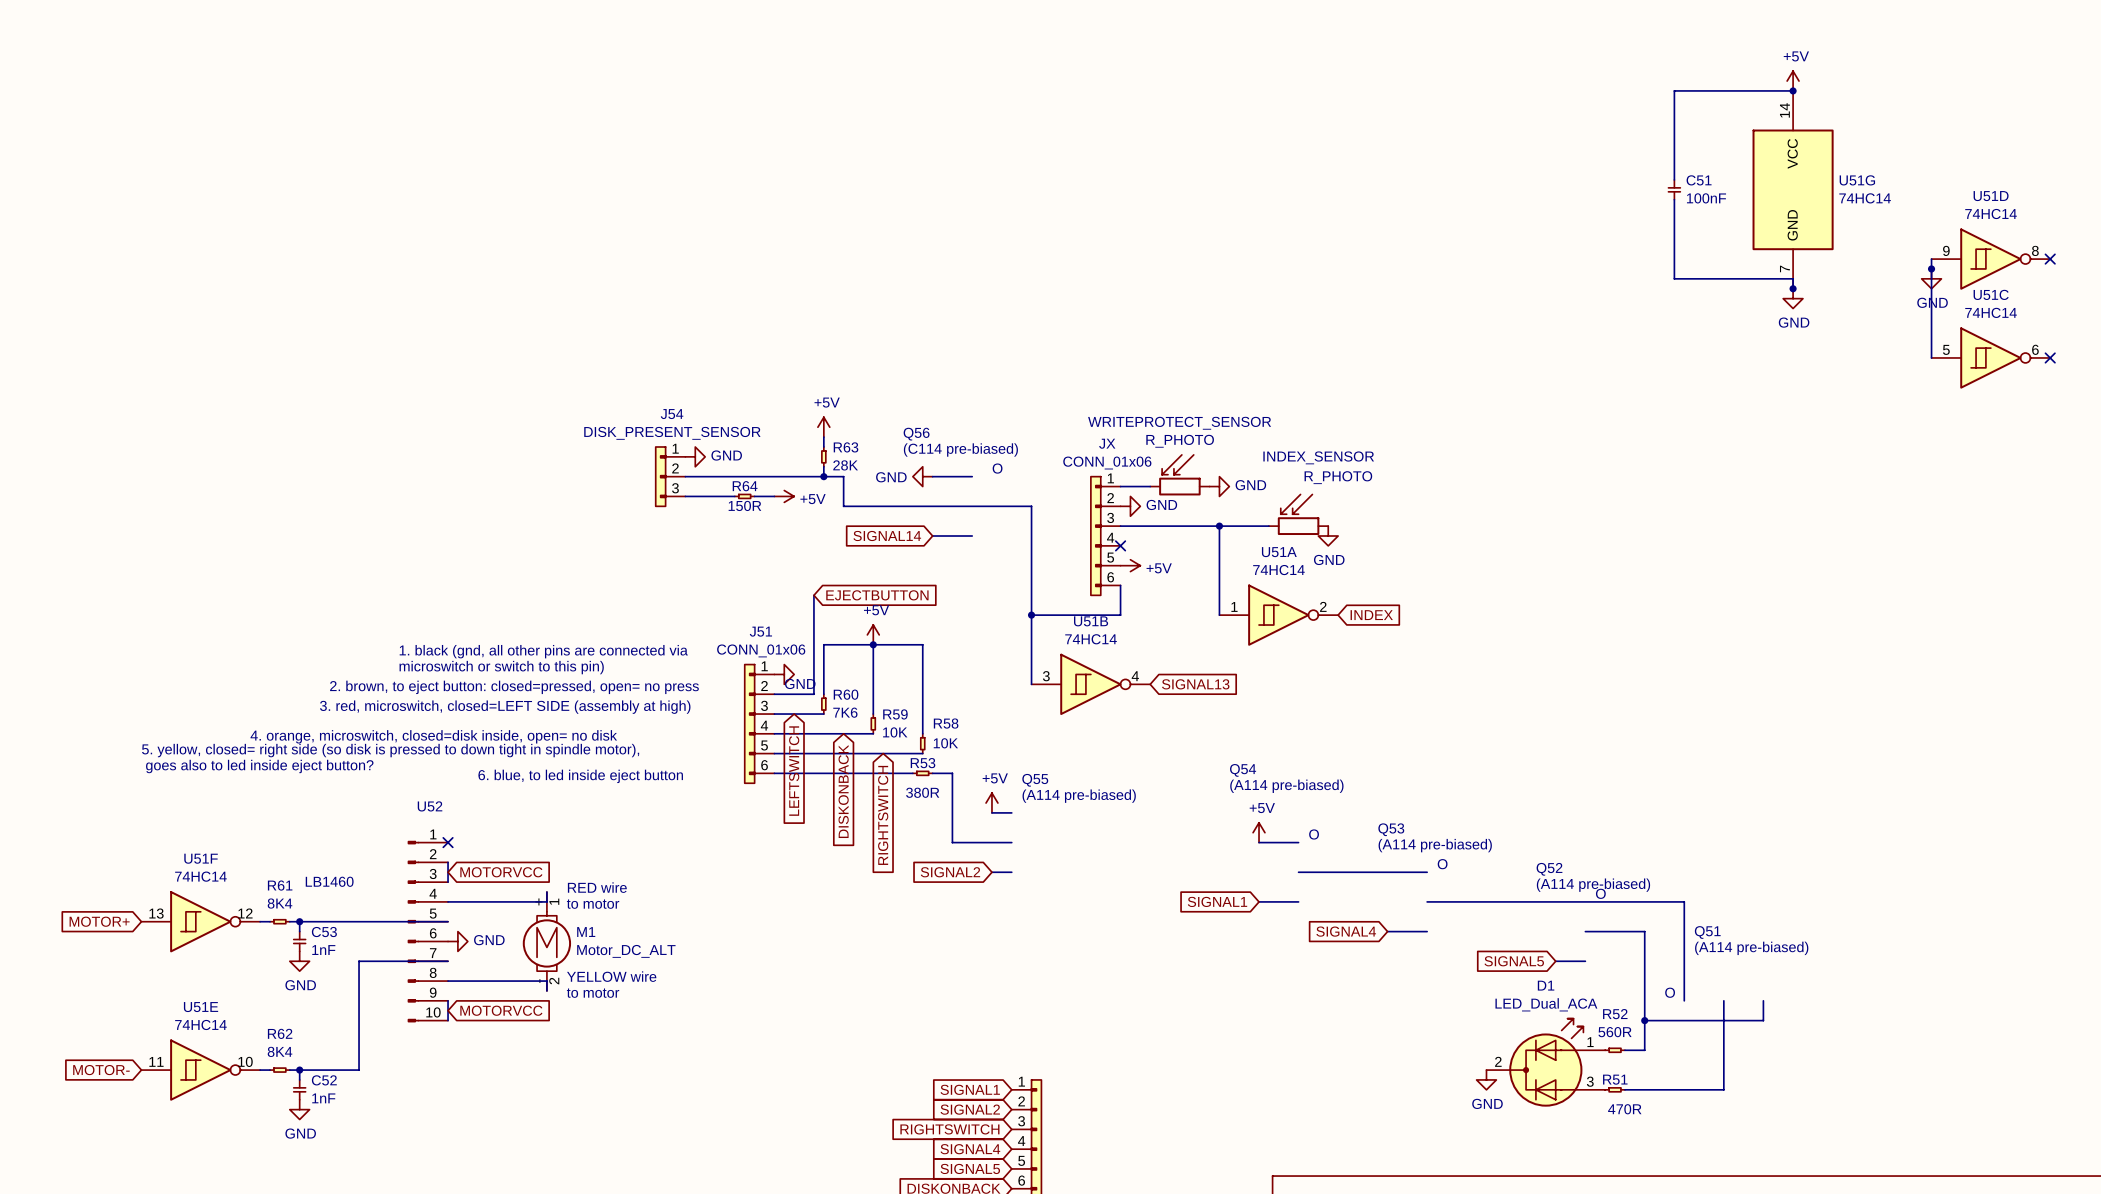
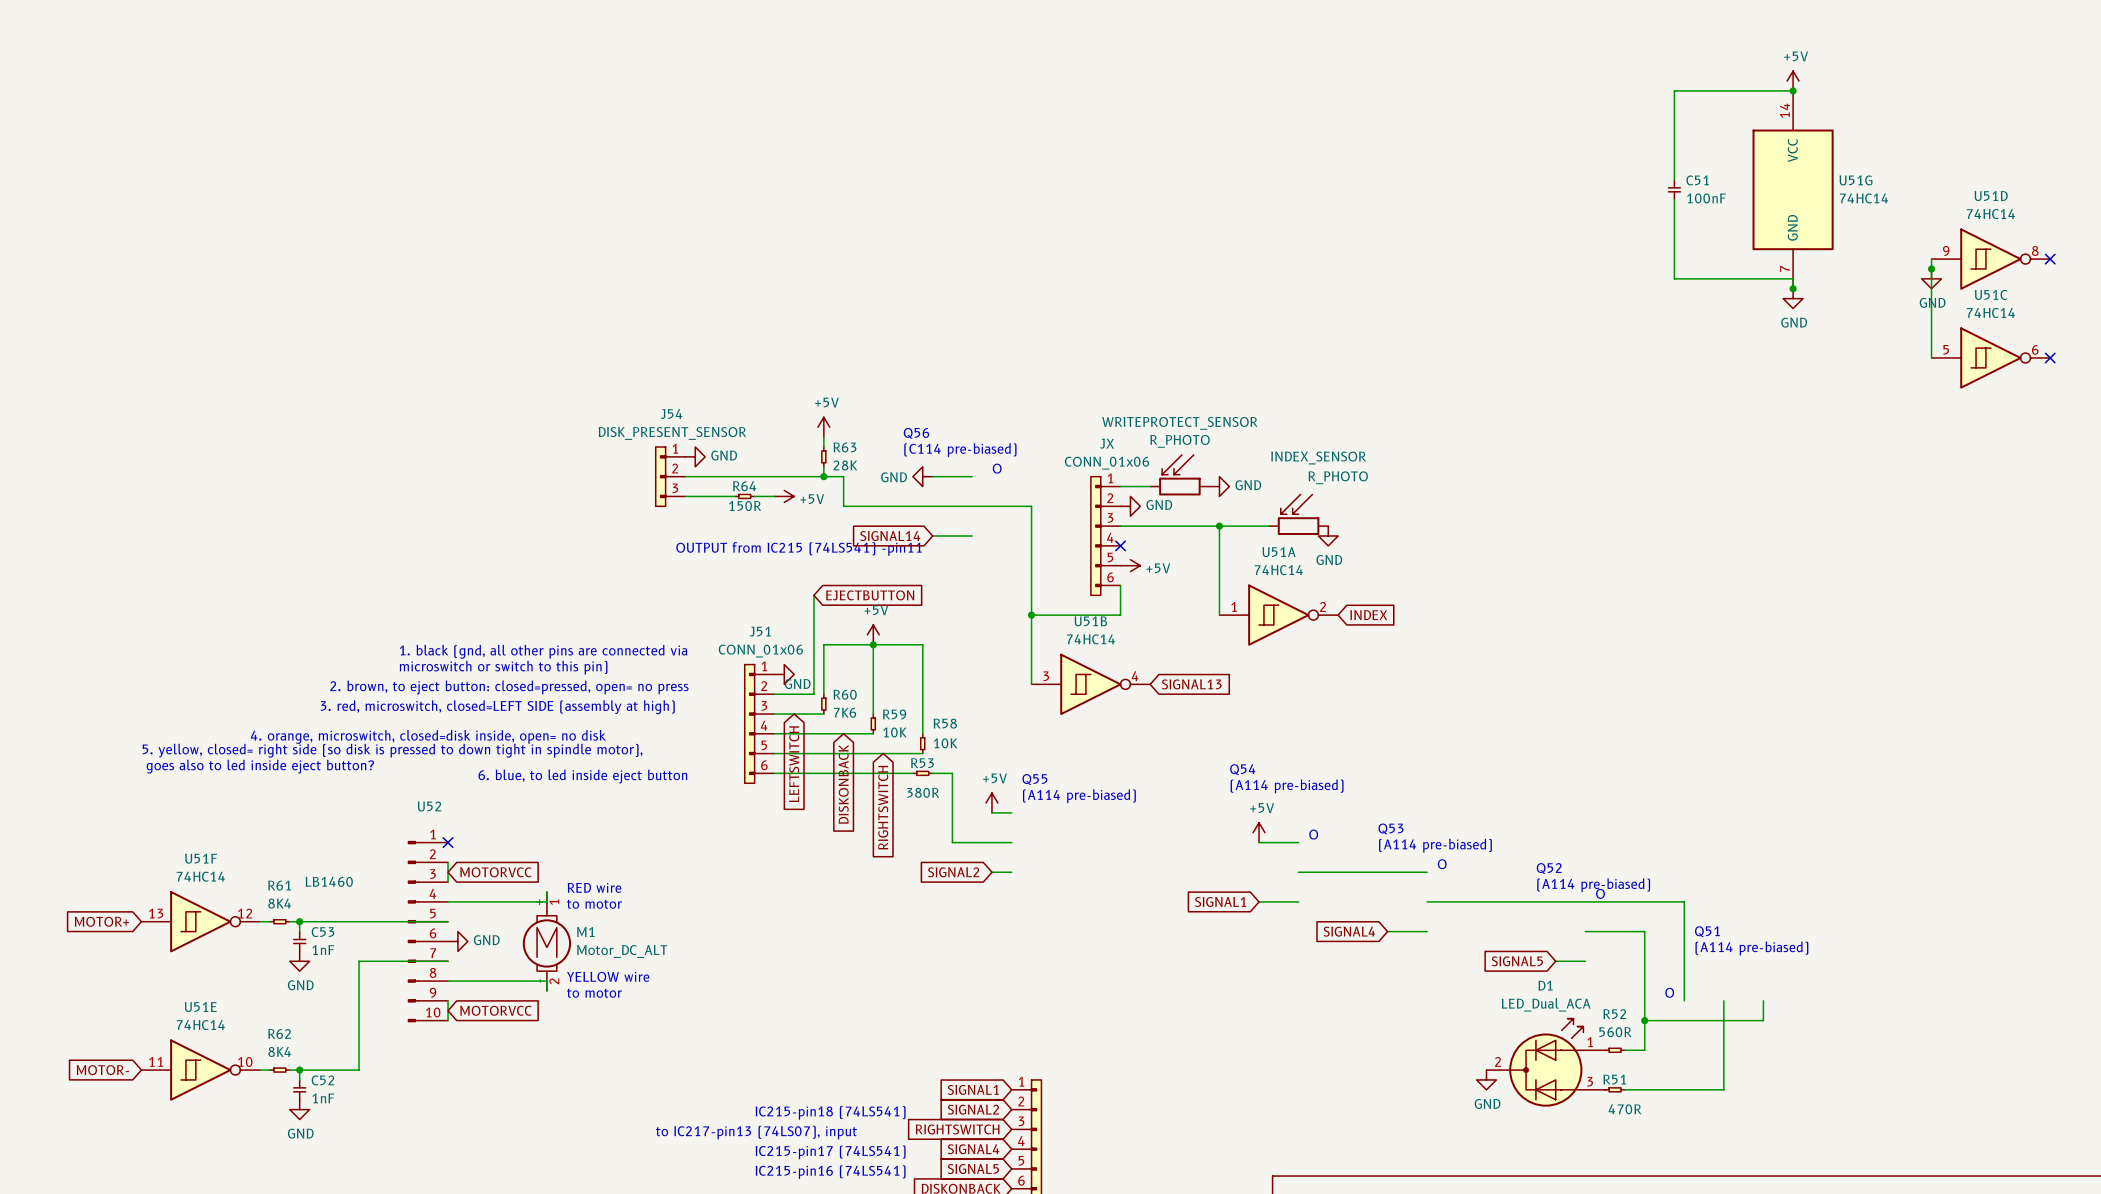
text: none -> OUTPUT from IC215 (74LS541) -pin11 (799, 548)
text: none -> IC215-pin18 (74LS541) (830, 1112)
text: none -> to IC217-pin13 (74LS07), input (756, 1132)
text: none -> IC215-pin17 (74LS541) (830, 1152)
text: none -> IC215-pin16 (74LS541) (830, 1172)

